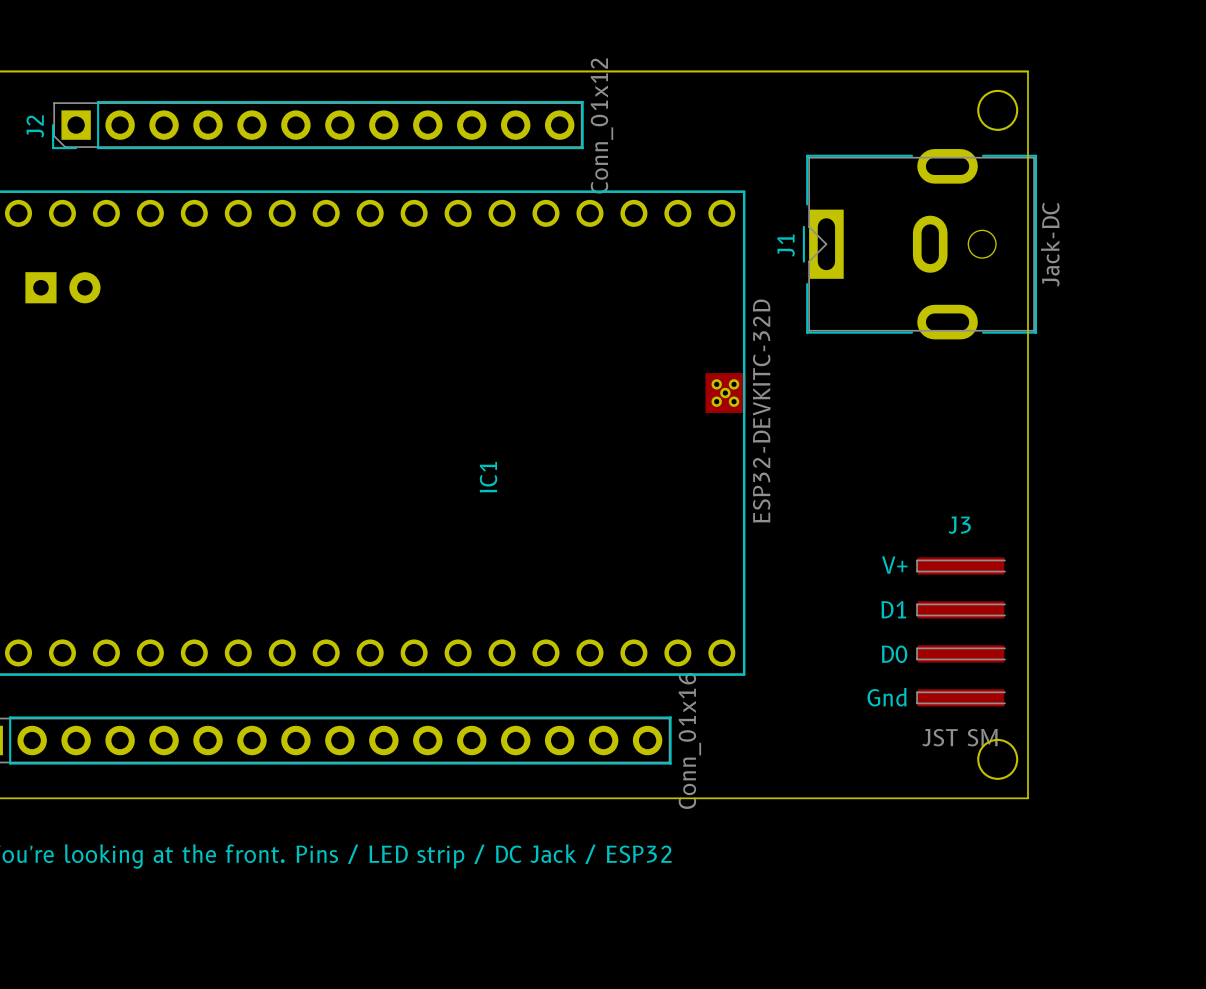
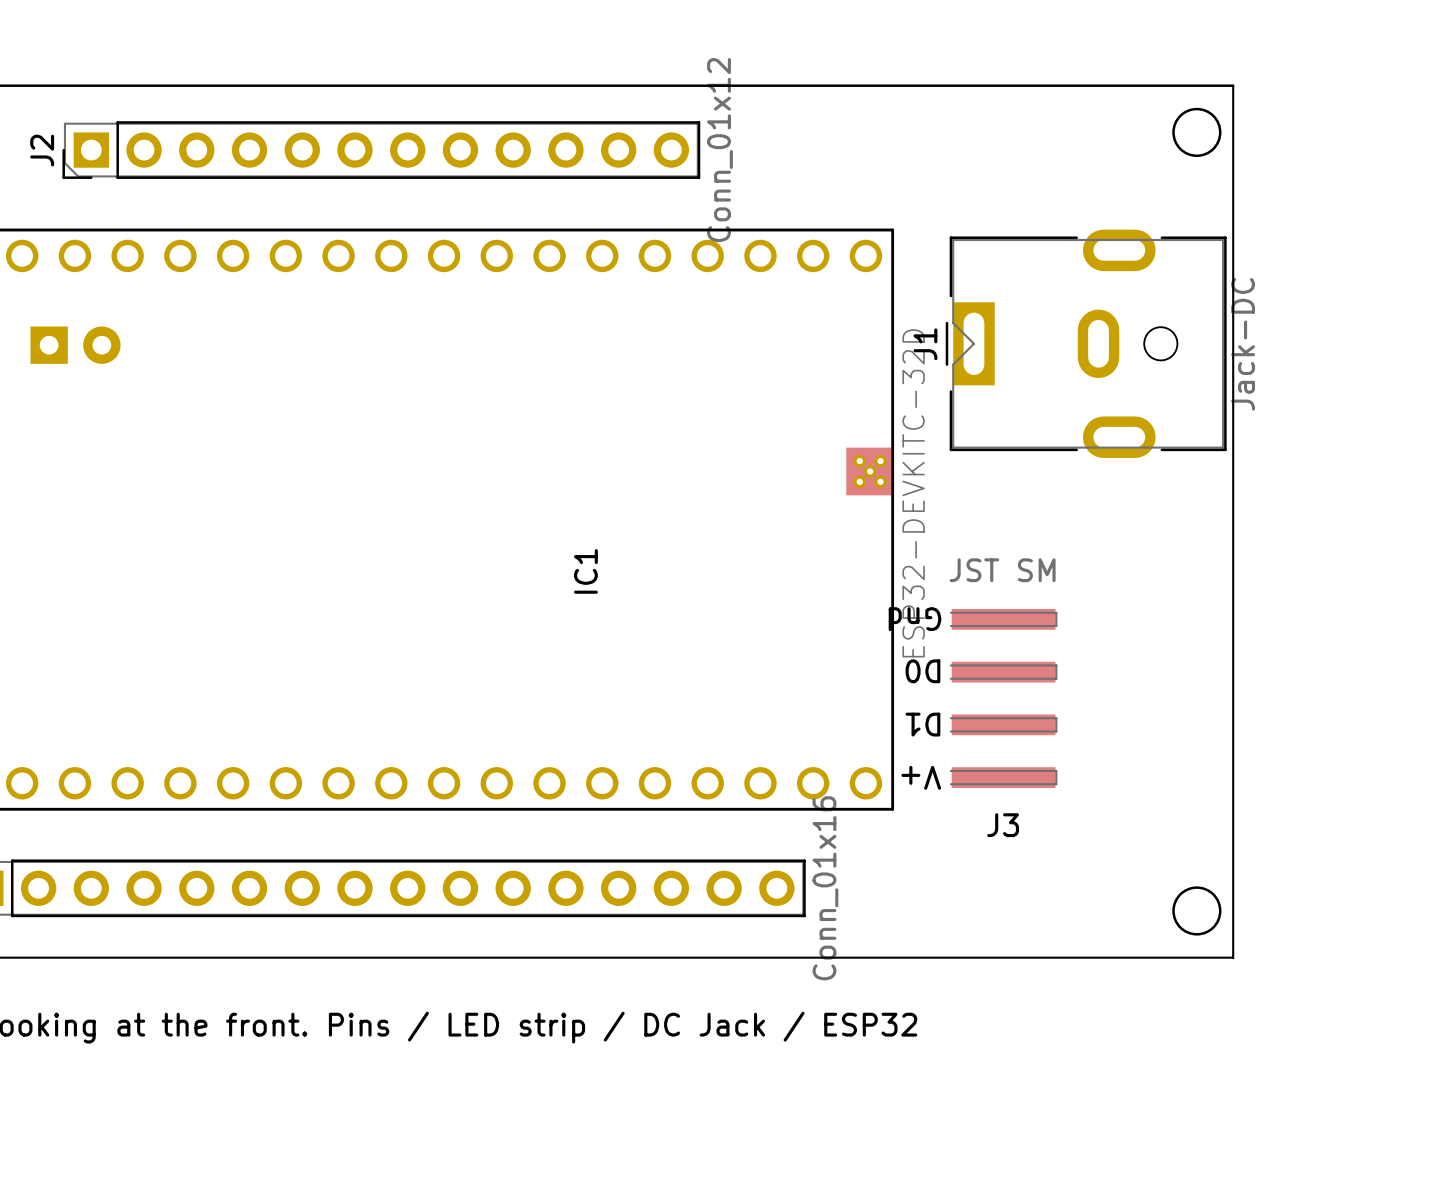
J1 position: (919, 244) -> (1086, 343)
J3 name position: J3 (959, 525) -> J3 (1003, 825)
J3 footprint: [916, 557, 1006, 707] -> [949, 609, 1058, 788]
J3 value position: JST SM (959, 737) -> JST SM (1002, 570)

